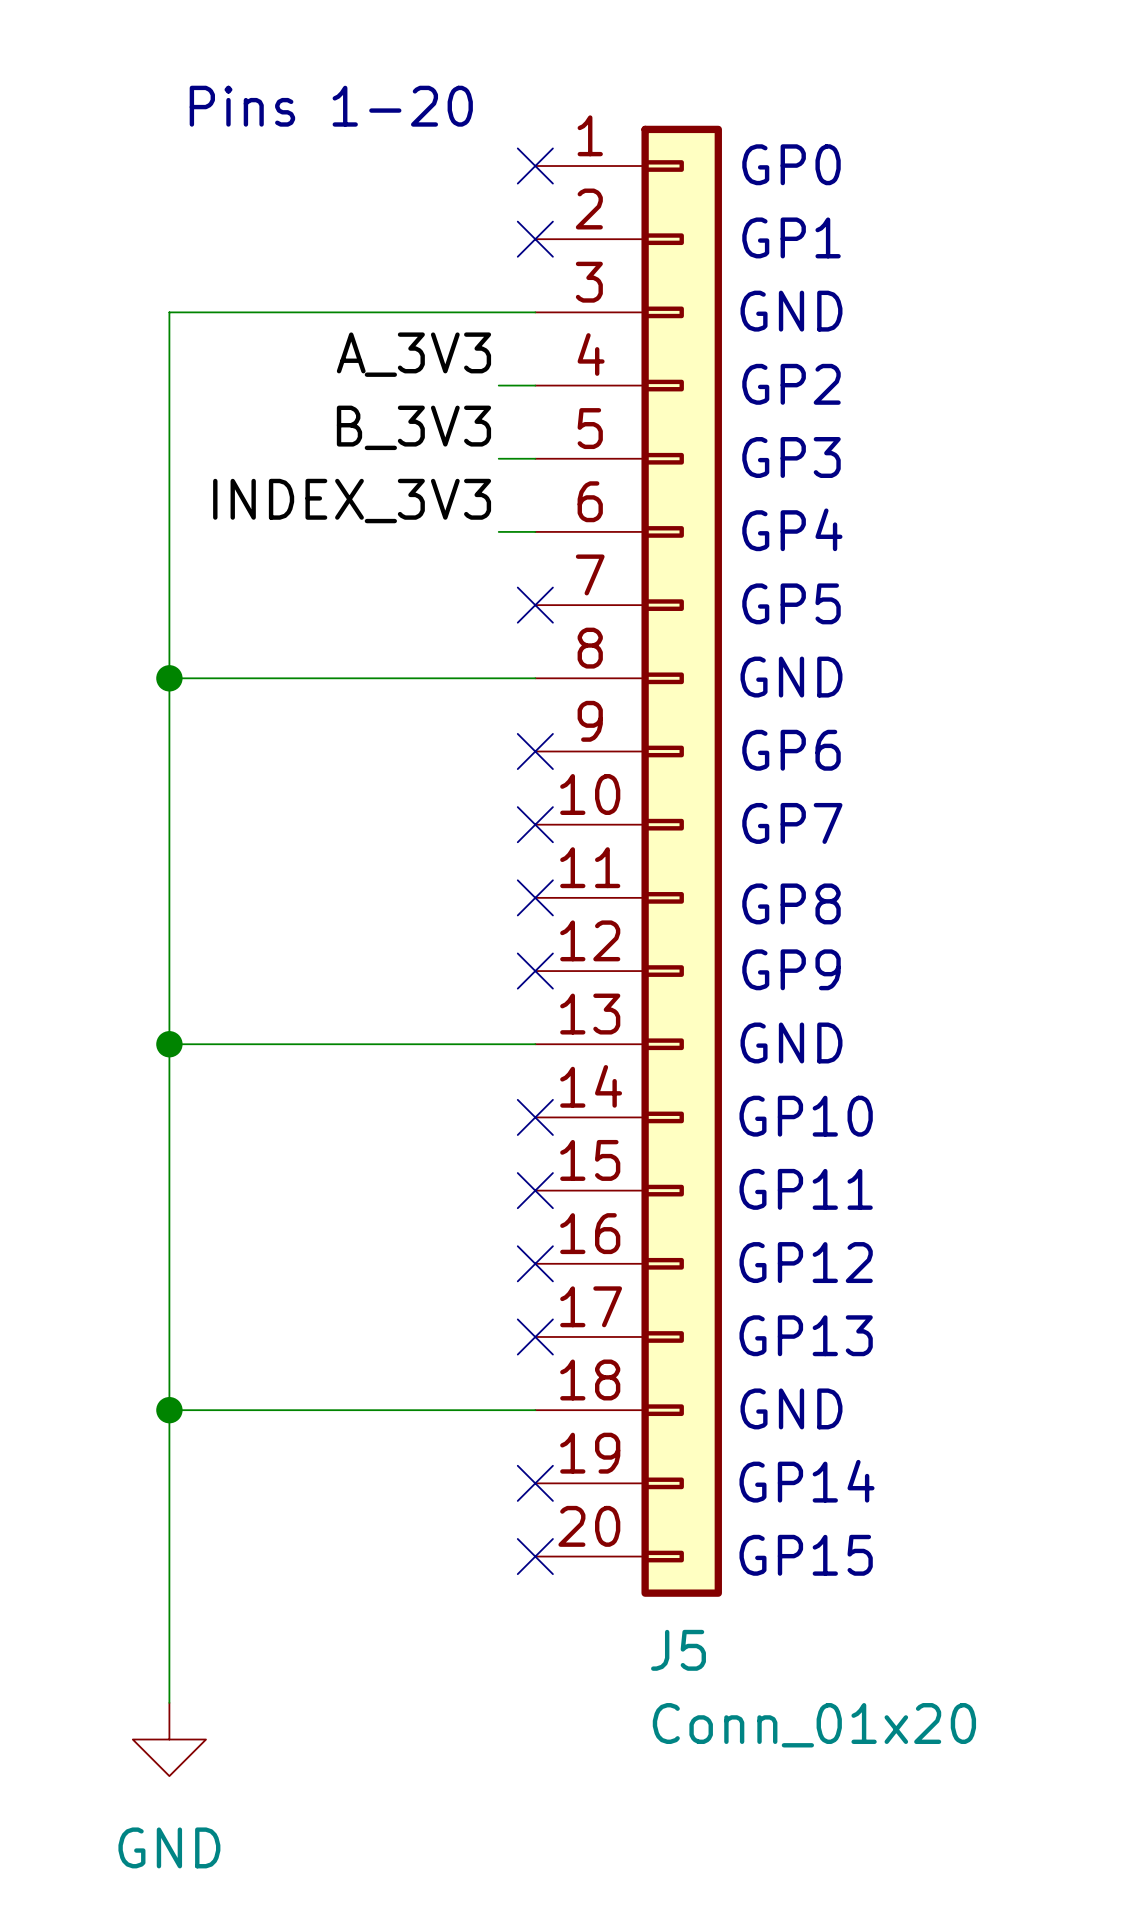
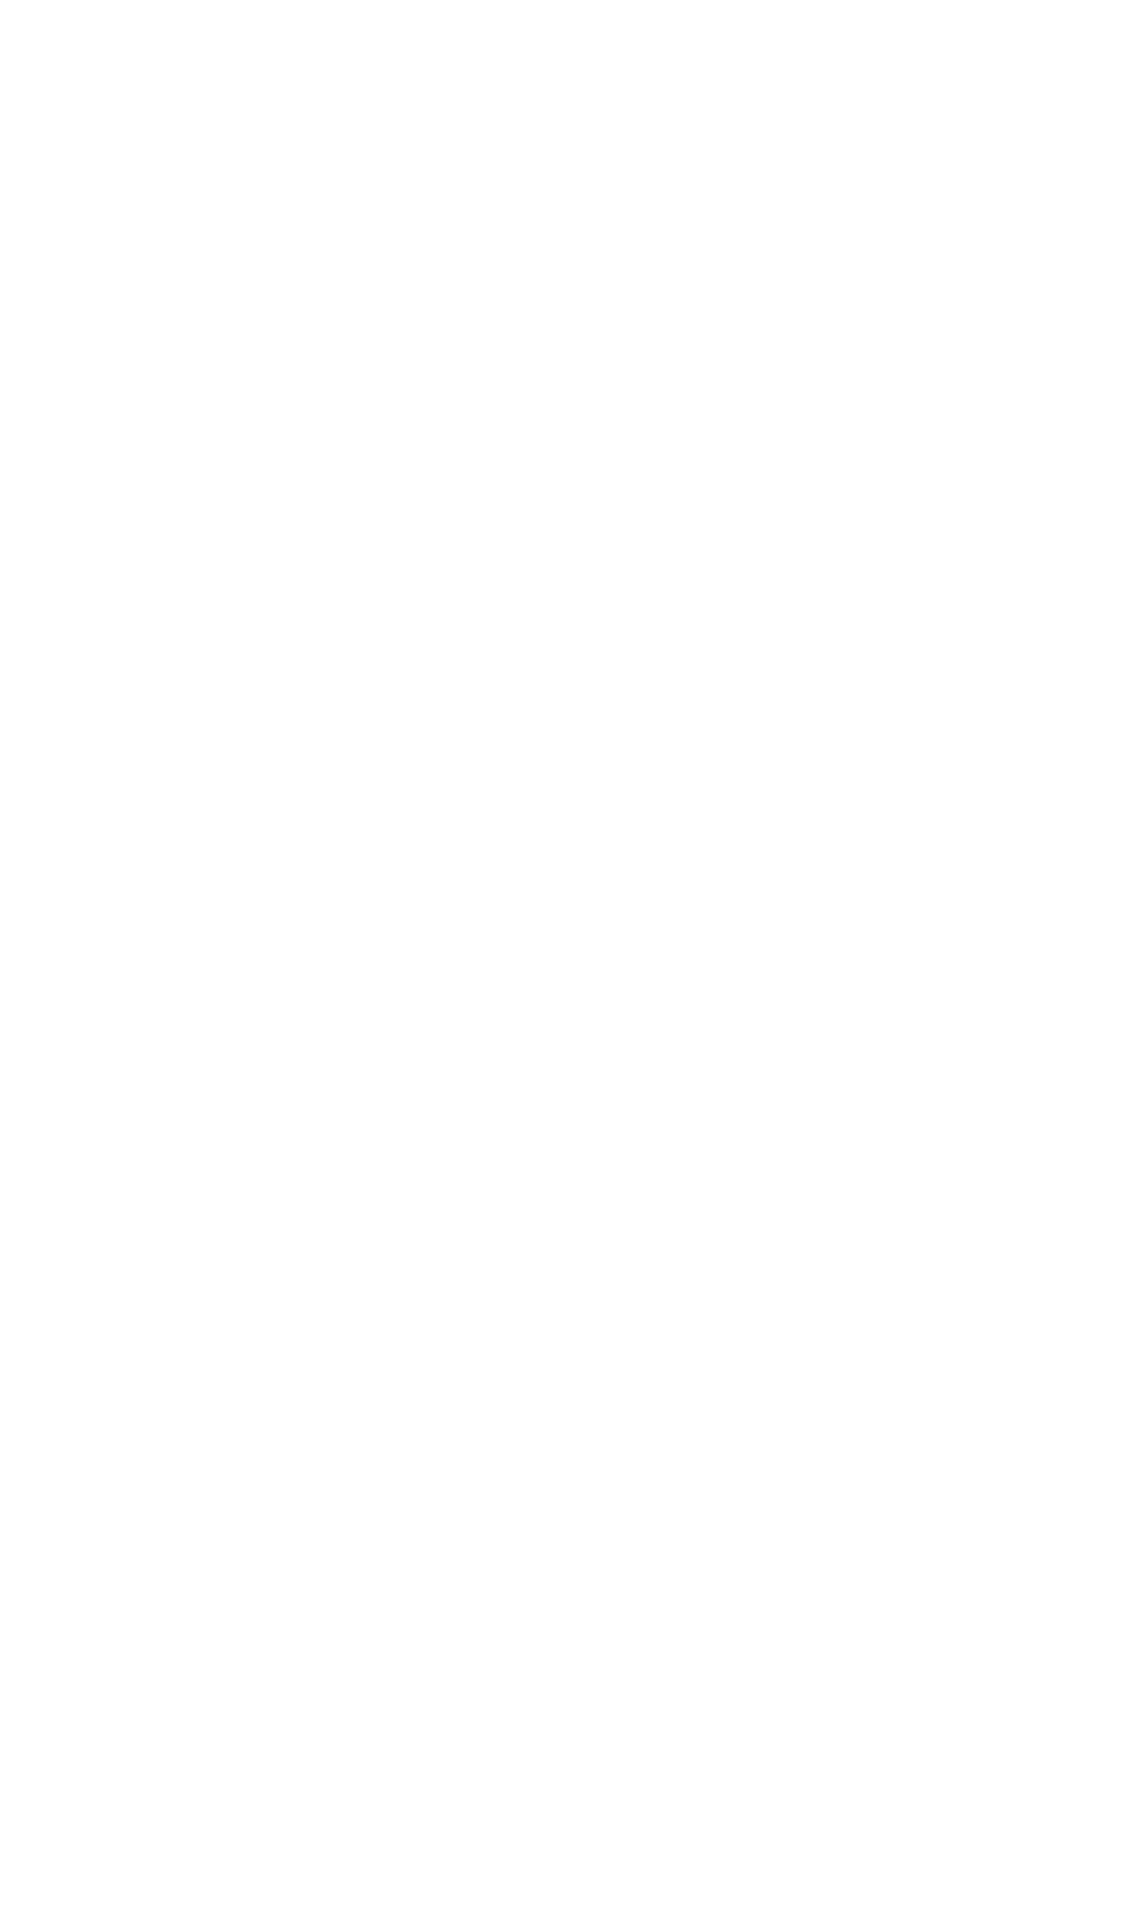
text: Pins 1-20 (331, 106) -> none
text: GP0 (791, 164) -> none
no-connect mark: (535, 166) -> none
text: GP1 (791, 237) -> none
no-connect mark: (535, 239) -> none
text: GND (791, 311) -> none
wire: (535, 312) (169, 312) (169, 1702) -> none
label: A_3V3 (413, 354) -> none
text: GP2 (791, 384) -> none
wire: (498, 385) (535, 385) -> none
label: B_3V3 (413, 427) -> none
text: GP3 (791, 457) -> none
wire: (498, 458) (535, 458) -> none
label: INDEX_3V3 (352, 501) -> none
text: GP4 (792, 529) -> none
wire: (498, 531) (535, 531) -> none
text: GP5 (791, 603) -> none
no-connect mark: (535, 605) -> none
text: GND (791, 677) -> none
wire: (169, 678) (535, 678) -> none
junction: (169, 678) -> none
text: GP6 (791, 750) -> none
no-connect mark: (535, 751) -> none
text: GP7 (792, 823) -> none
no-connect mark: (535, 824) -> none
J5: Conn_01x20 (628, 861) -> none
no-connect mark: (535, 897) -> none
text: GP8 (791, 903) -> none
text: GP9 (791, 969) -> none
no-connect mark: (535, 971) -> none
text: GND (791, 1042) -> none
wire: (169, 1044) (535, 1044) -> none
junction: (169, 1044) -> none
text: GP10 (806, 1116) -> none
no-connect mark: (535, 1117) -> none
text: GP11 (806, 1189) -> none
no-connect mark: (535, 1190) -> none
text: GP12 (806, 1262) -> none
no-connect mark: (535, 1263) -> none
text: GP13 (806, 1335) -> none
no-connect mark: (535, 1336) -> none
text: GND (791, 1408) -> none
wire: (169, 1410) (535, 1410) -> none
junction: (169, 1410) -> none
text: GP14 (807, 1481) -> none
no-connect mark: (535, 1483) -> none
text: GP15 (806, 1555) -> none
no-connect mark: (535, 1556) -> none
power symbol: GND (169, 1739) -> none

